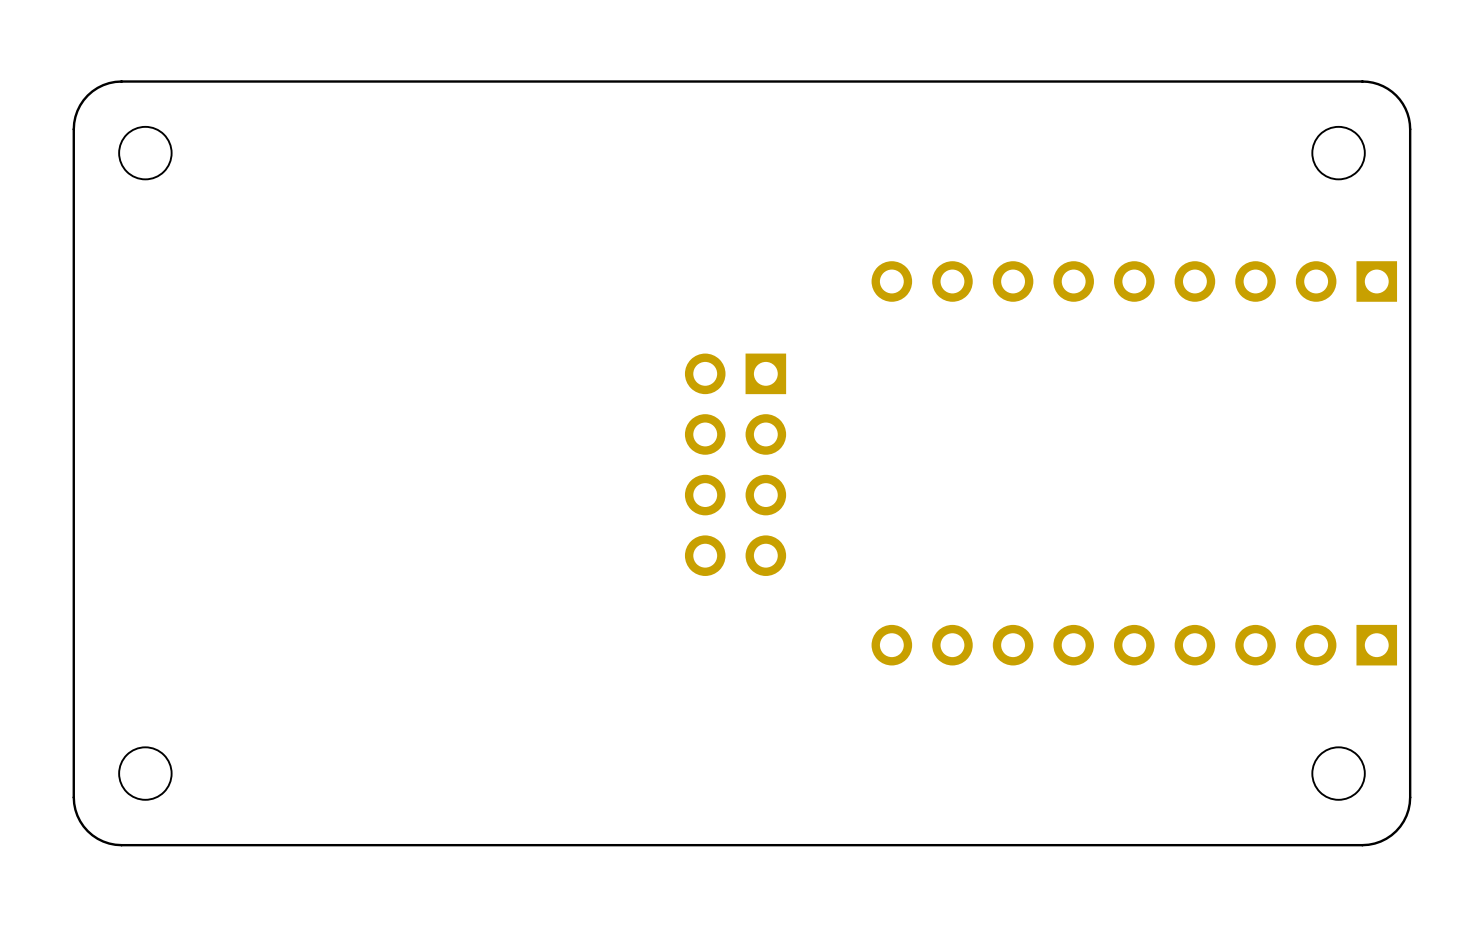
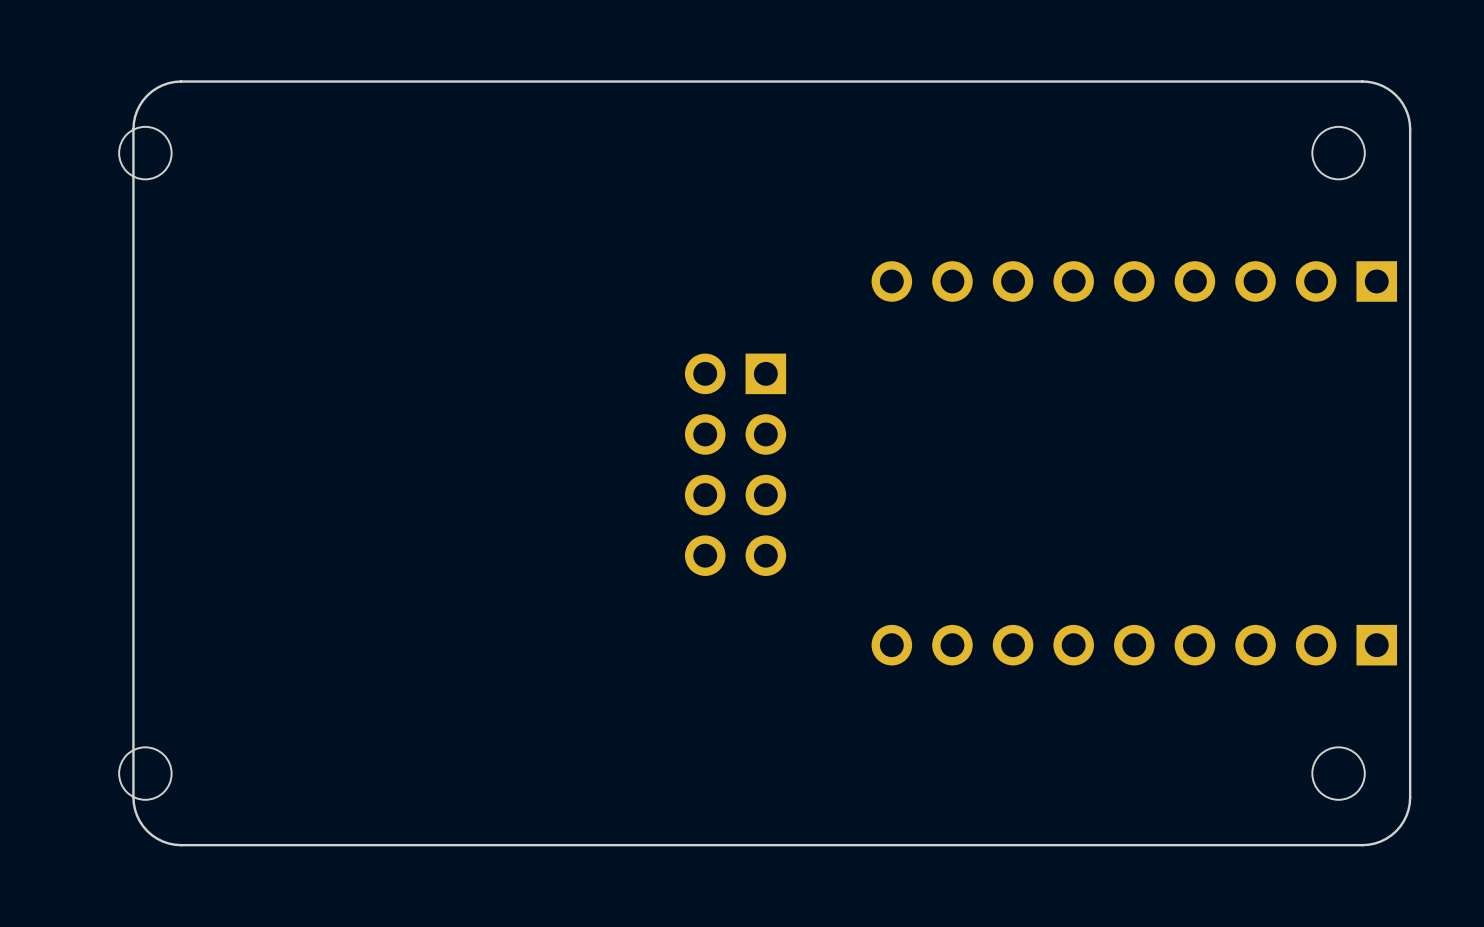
board edge: (181, 81) (121, 81) (103, 85) (92, 91) (83, 100) (77, 110) (73, 129) (74, 803) (77, 815) (83, 826) (92, 835) (103, 841) (121, 845) (181, 845) -> (181, 81) (162, 85) (147, 95) (137, 110) (133, 129) (133, 803) (139, 821) (147, 831) (162, 841) (181, 845)

